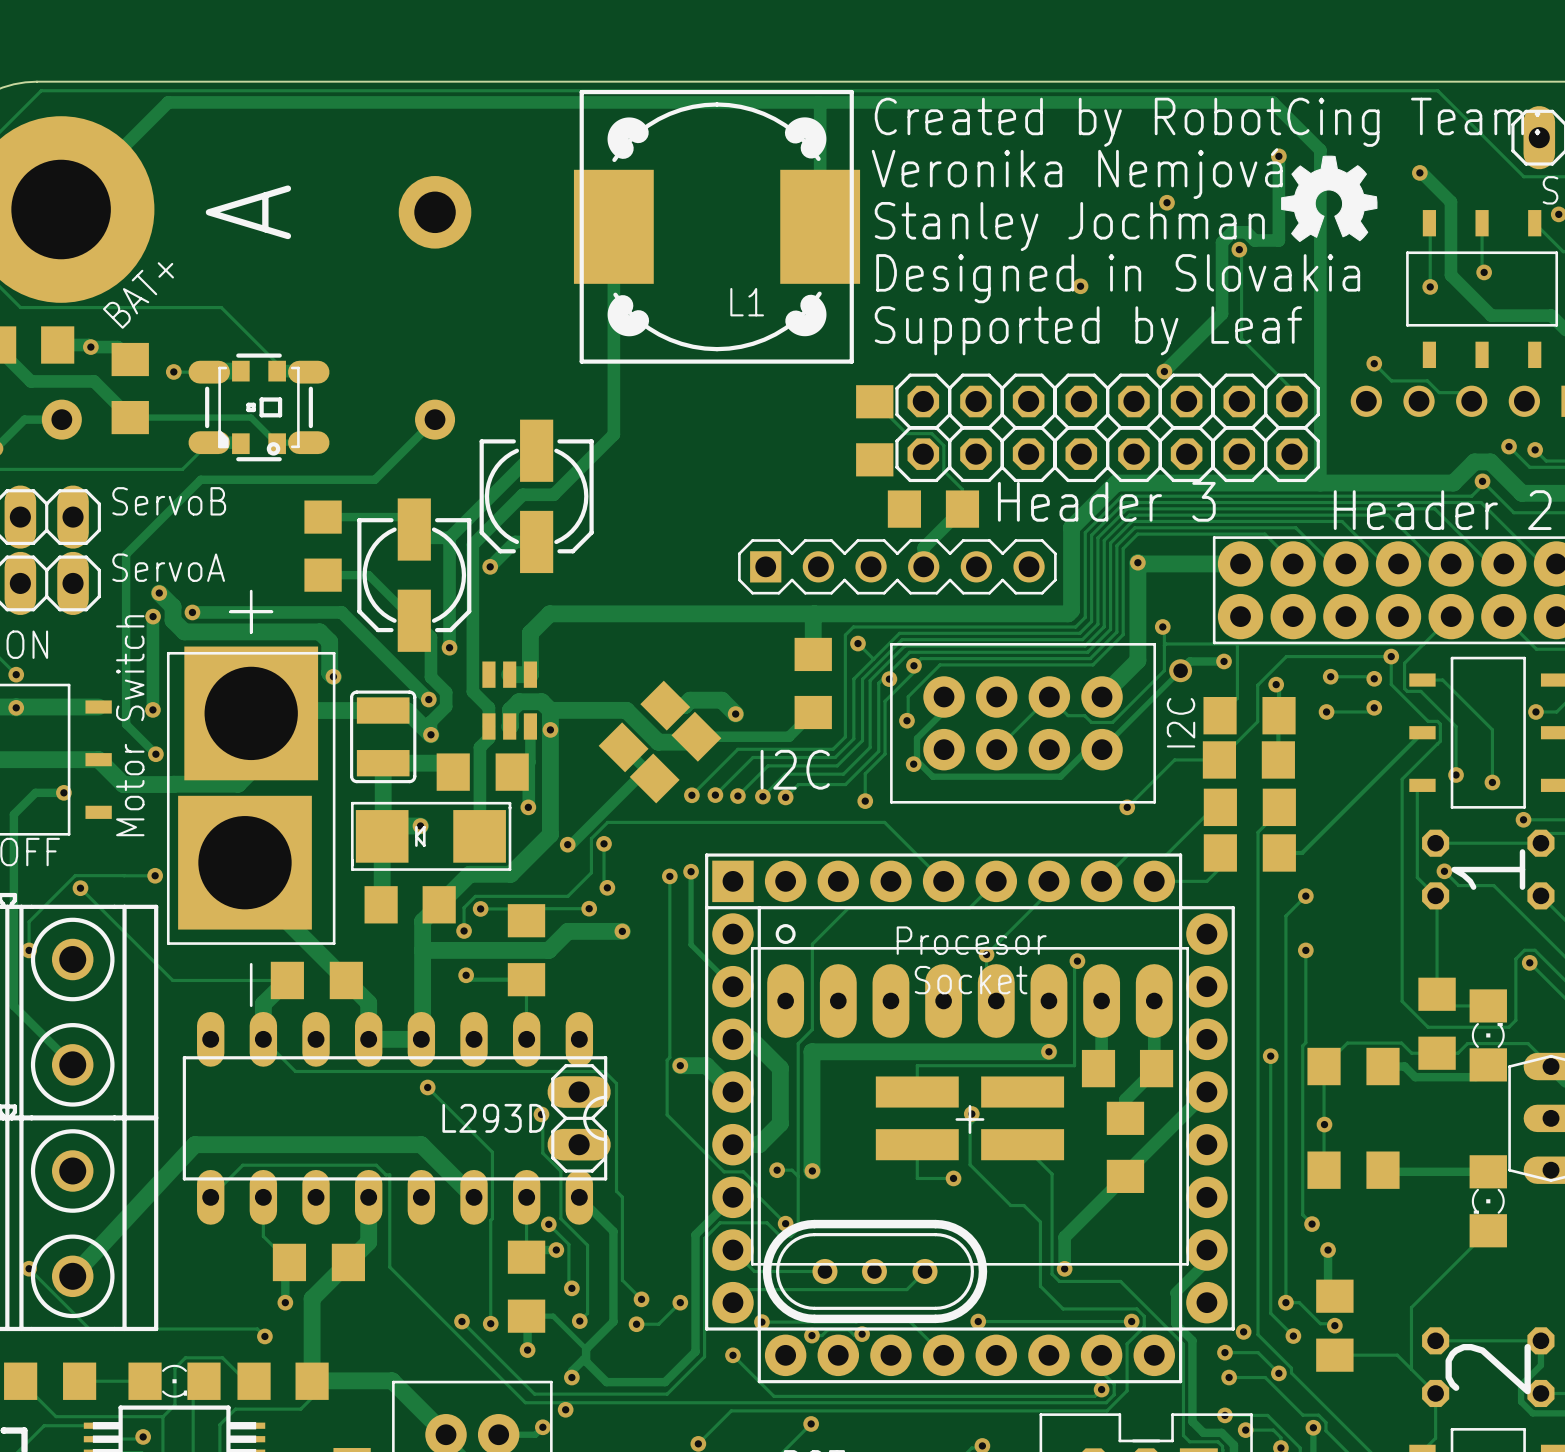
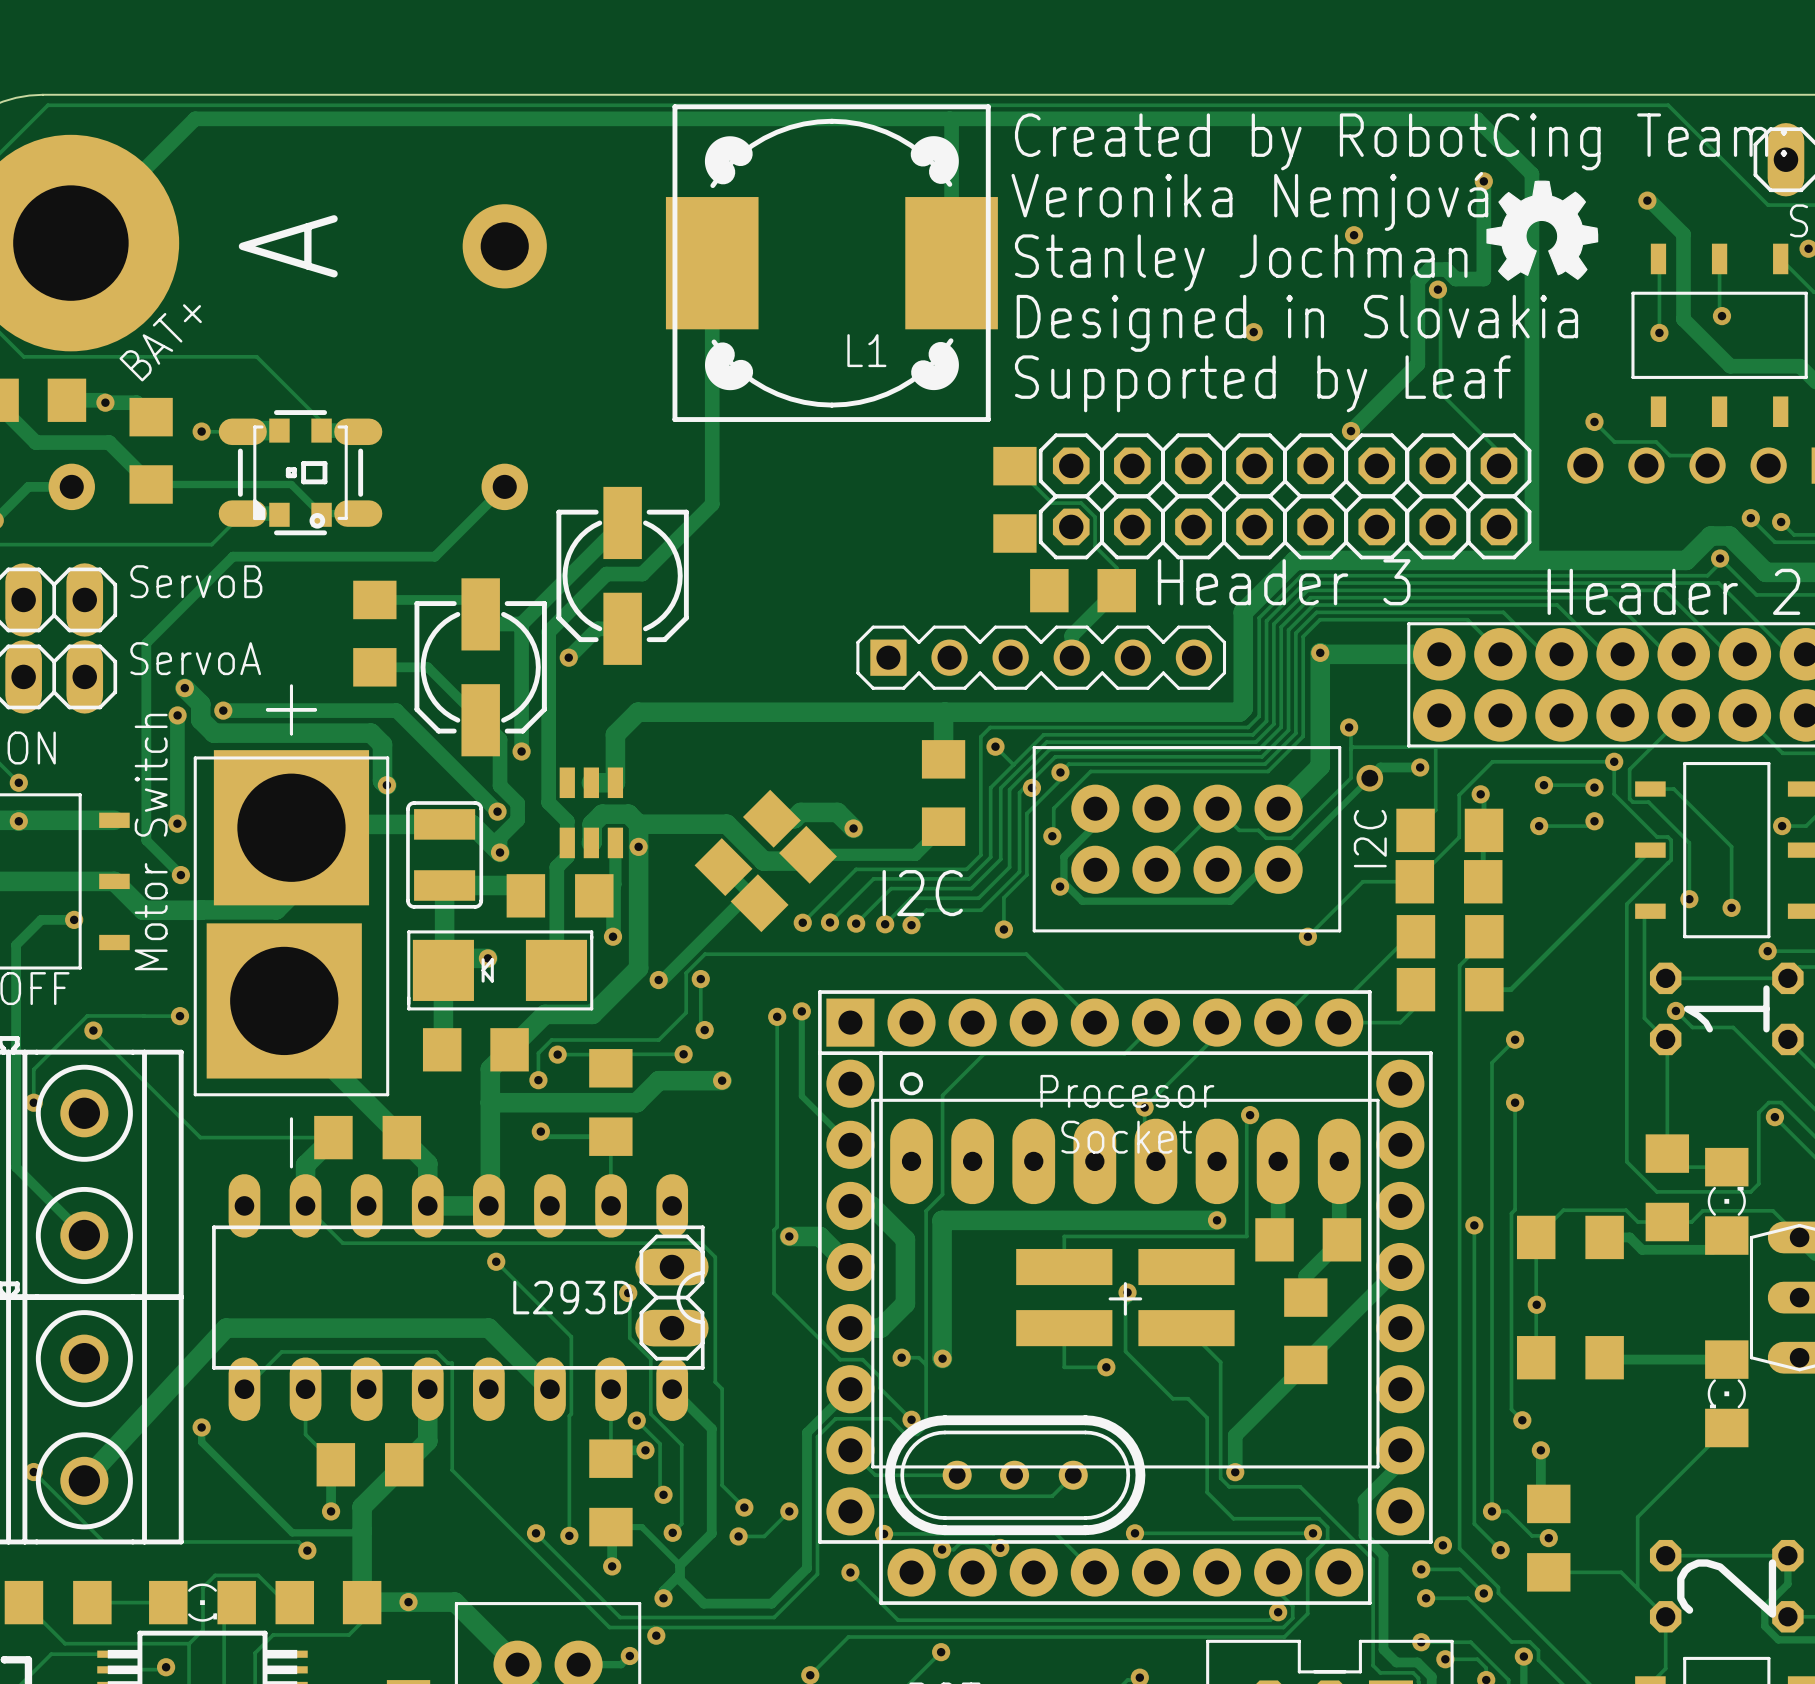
track: none -> (201, 1427) (201, 1442) (292, 1532) (360, 1532) (362, 1530)
via: none -> (201, 1427)
via: none -> (408, 1602)

